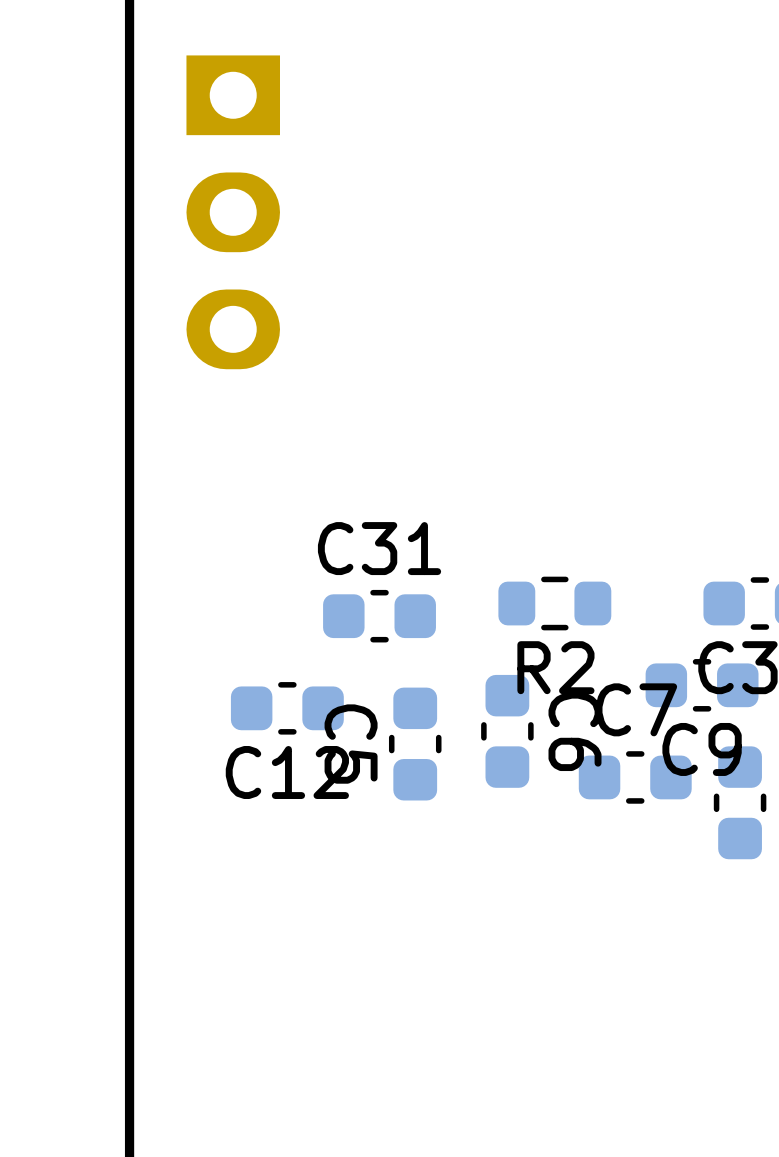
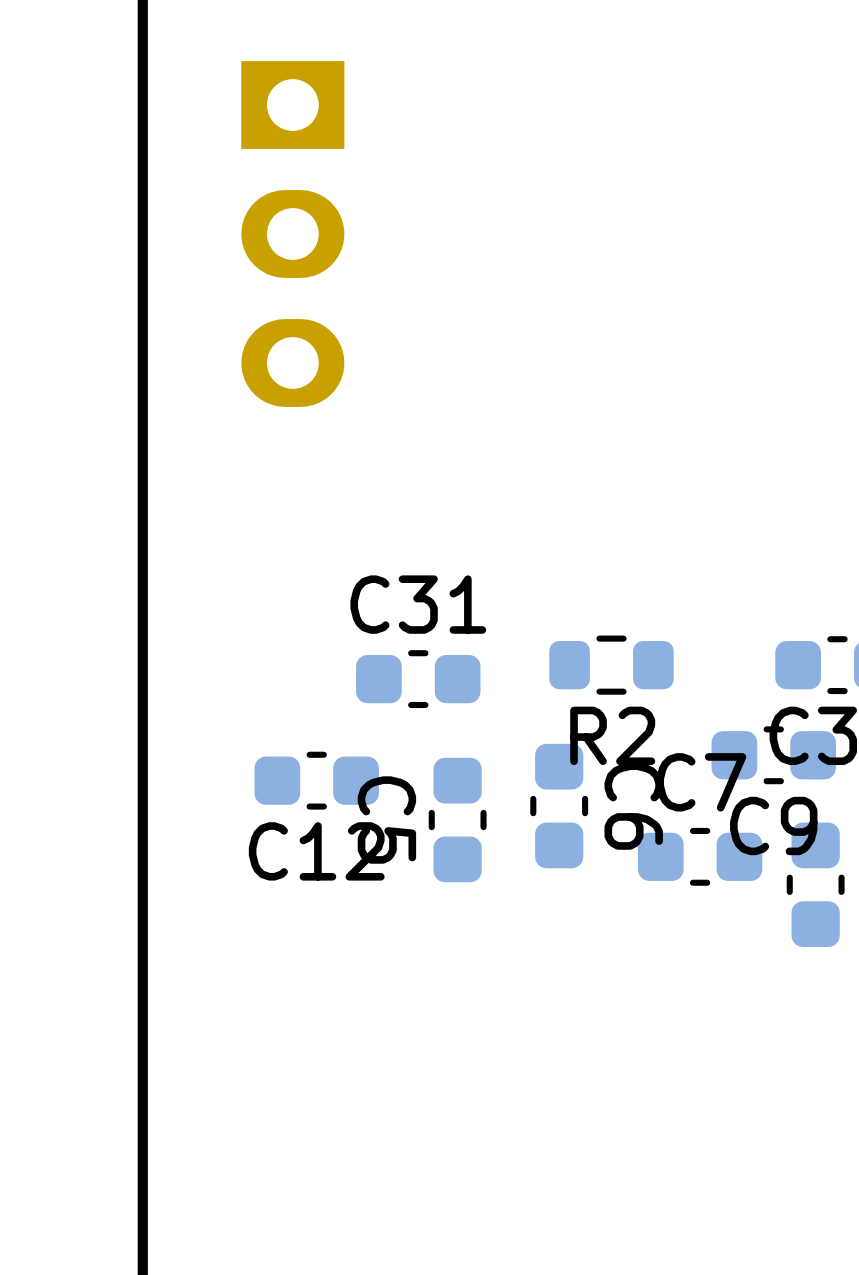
part position: (233, 212) -> (292, 234)

